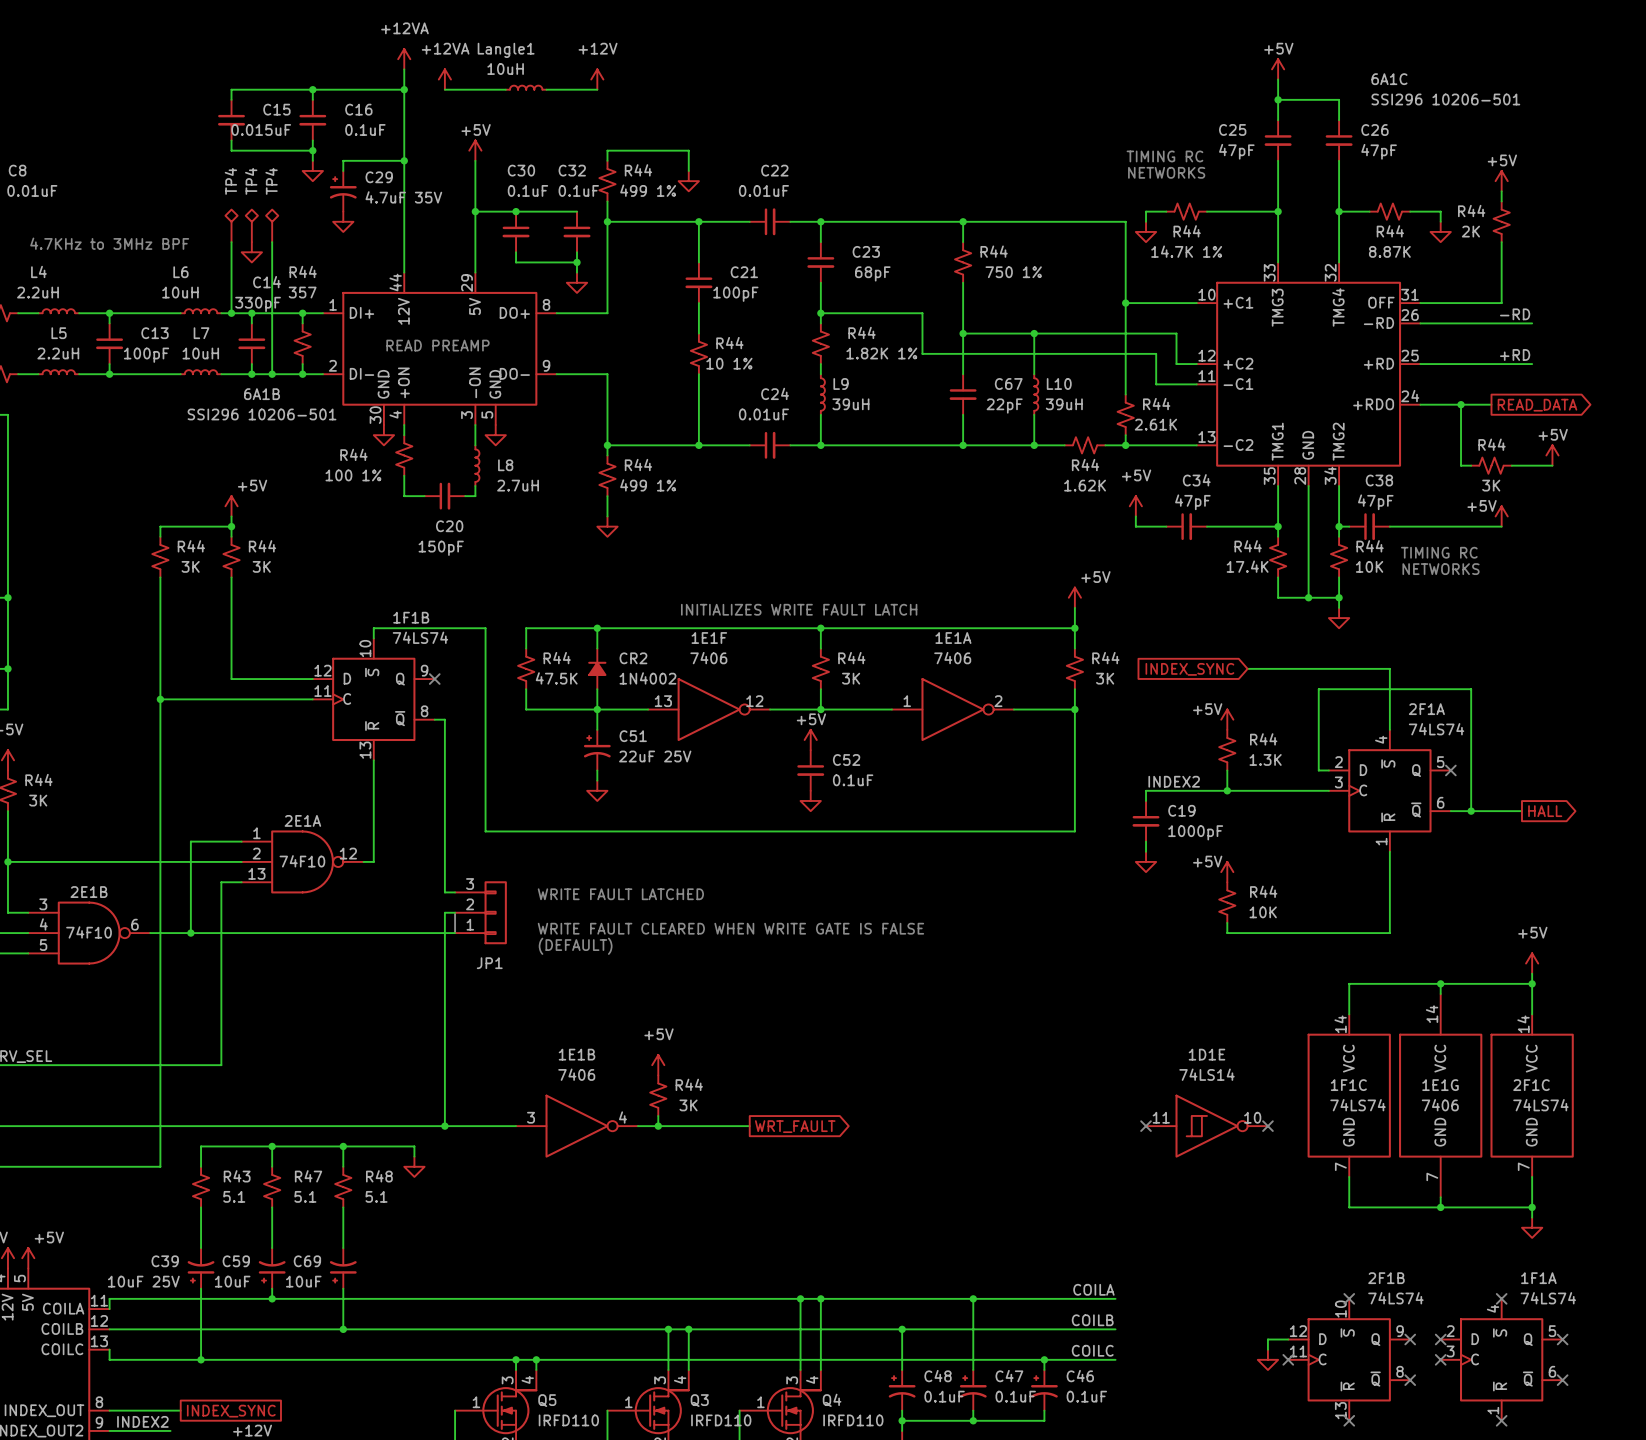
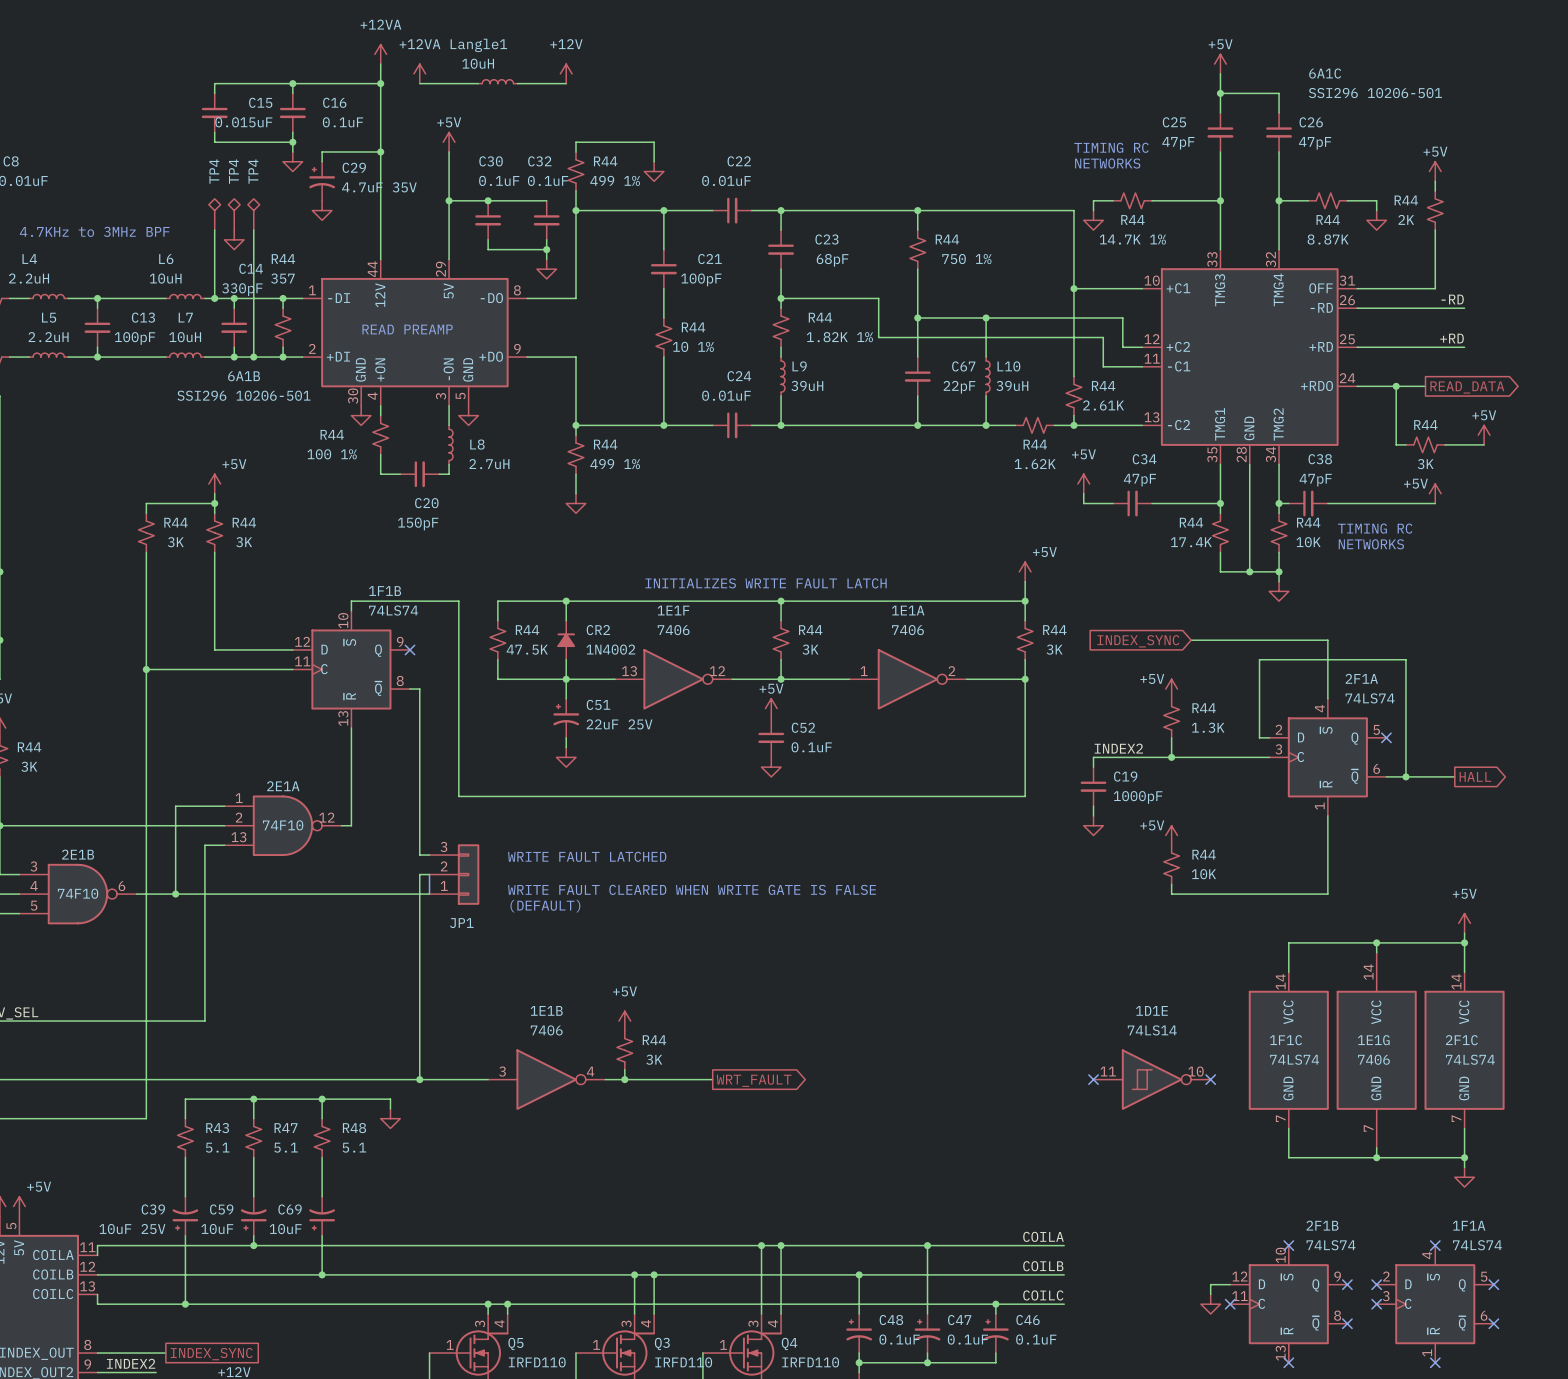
6A1B pin name: DI+ (361, 312) -> -DI (339, 298)
6A1B pin name: DO+ (514, 312) -> -DO (491, 298)
6A1B pin name: DI- (361, 373) -> +DI (338, 356)
6A1B pin name: DO- (514, 373) -> +DO (491, 356)

